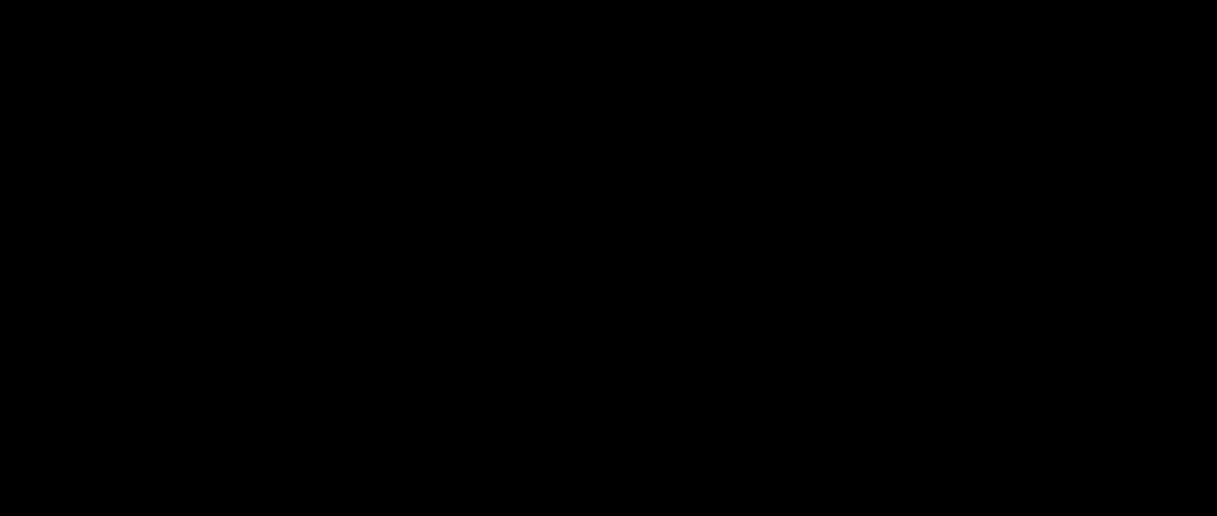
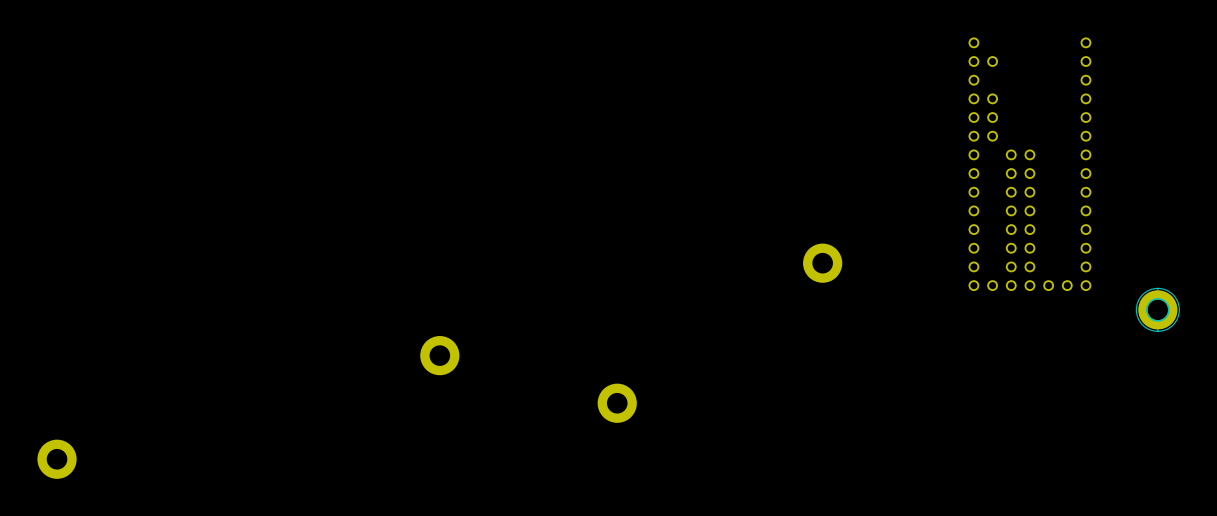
part: none -> (1029, 164)
part: none -> (822, 263)
part: none -> (1157, 309)
part: none -> (439, 355)
part: none -> (617, 403)
part: none -> (57, 459)

